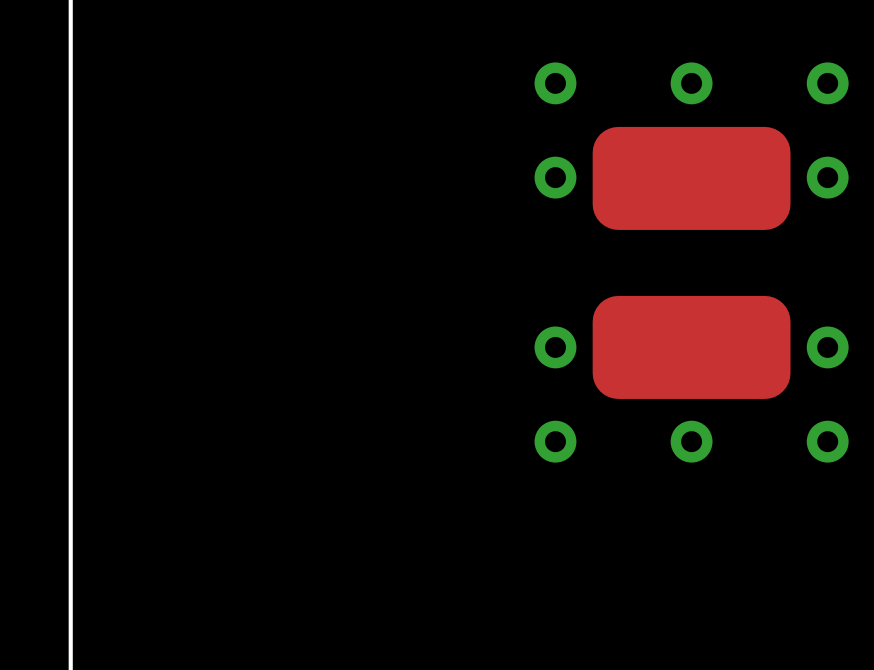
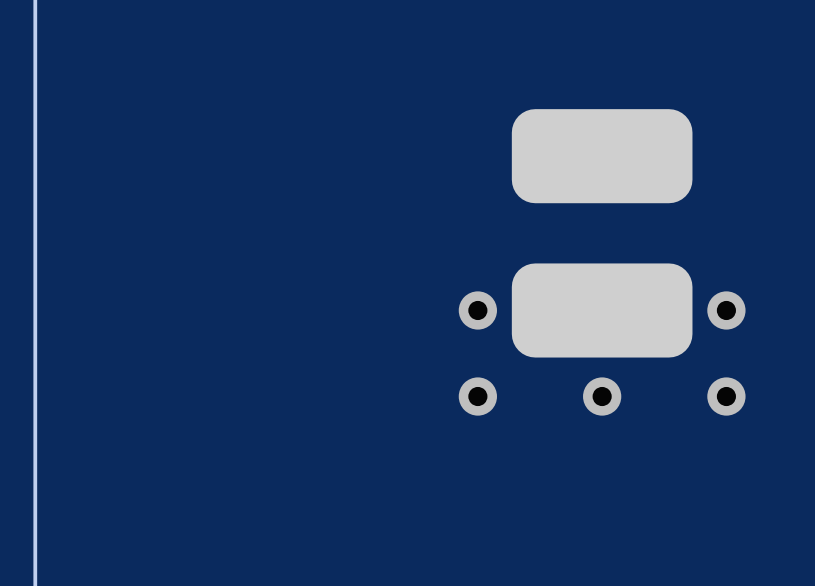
via: (555, 83) -> none
via: (691, 83) -> none
via: (827, 83) -> none
via: (555, 177) -> none
via: (827, 177) -> none

